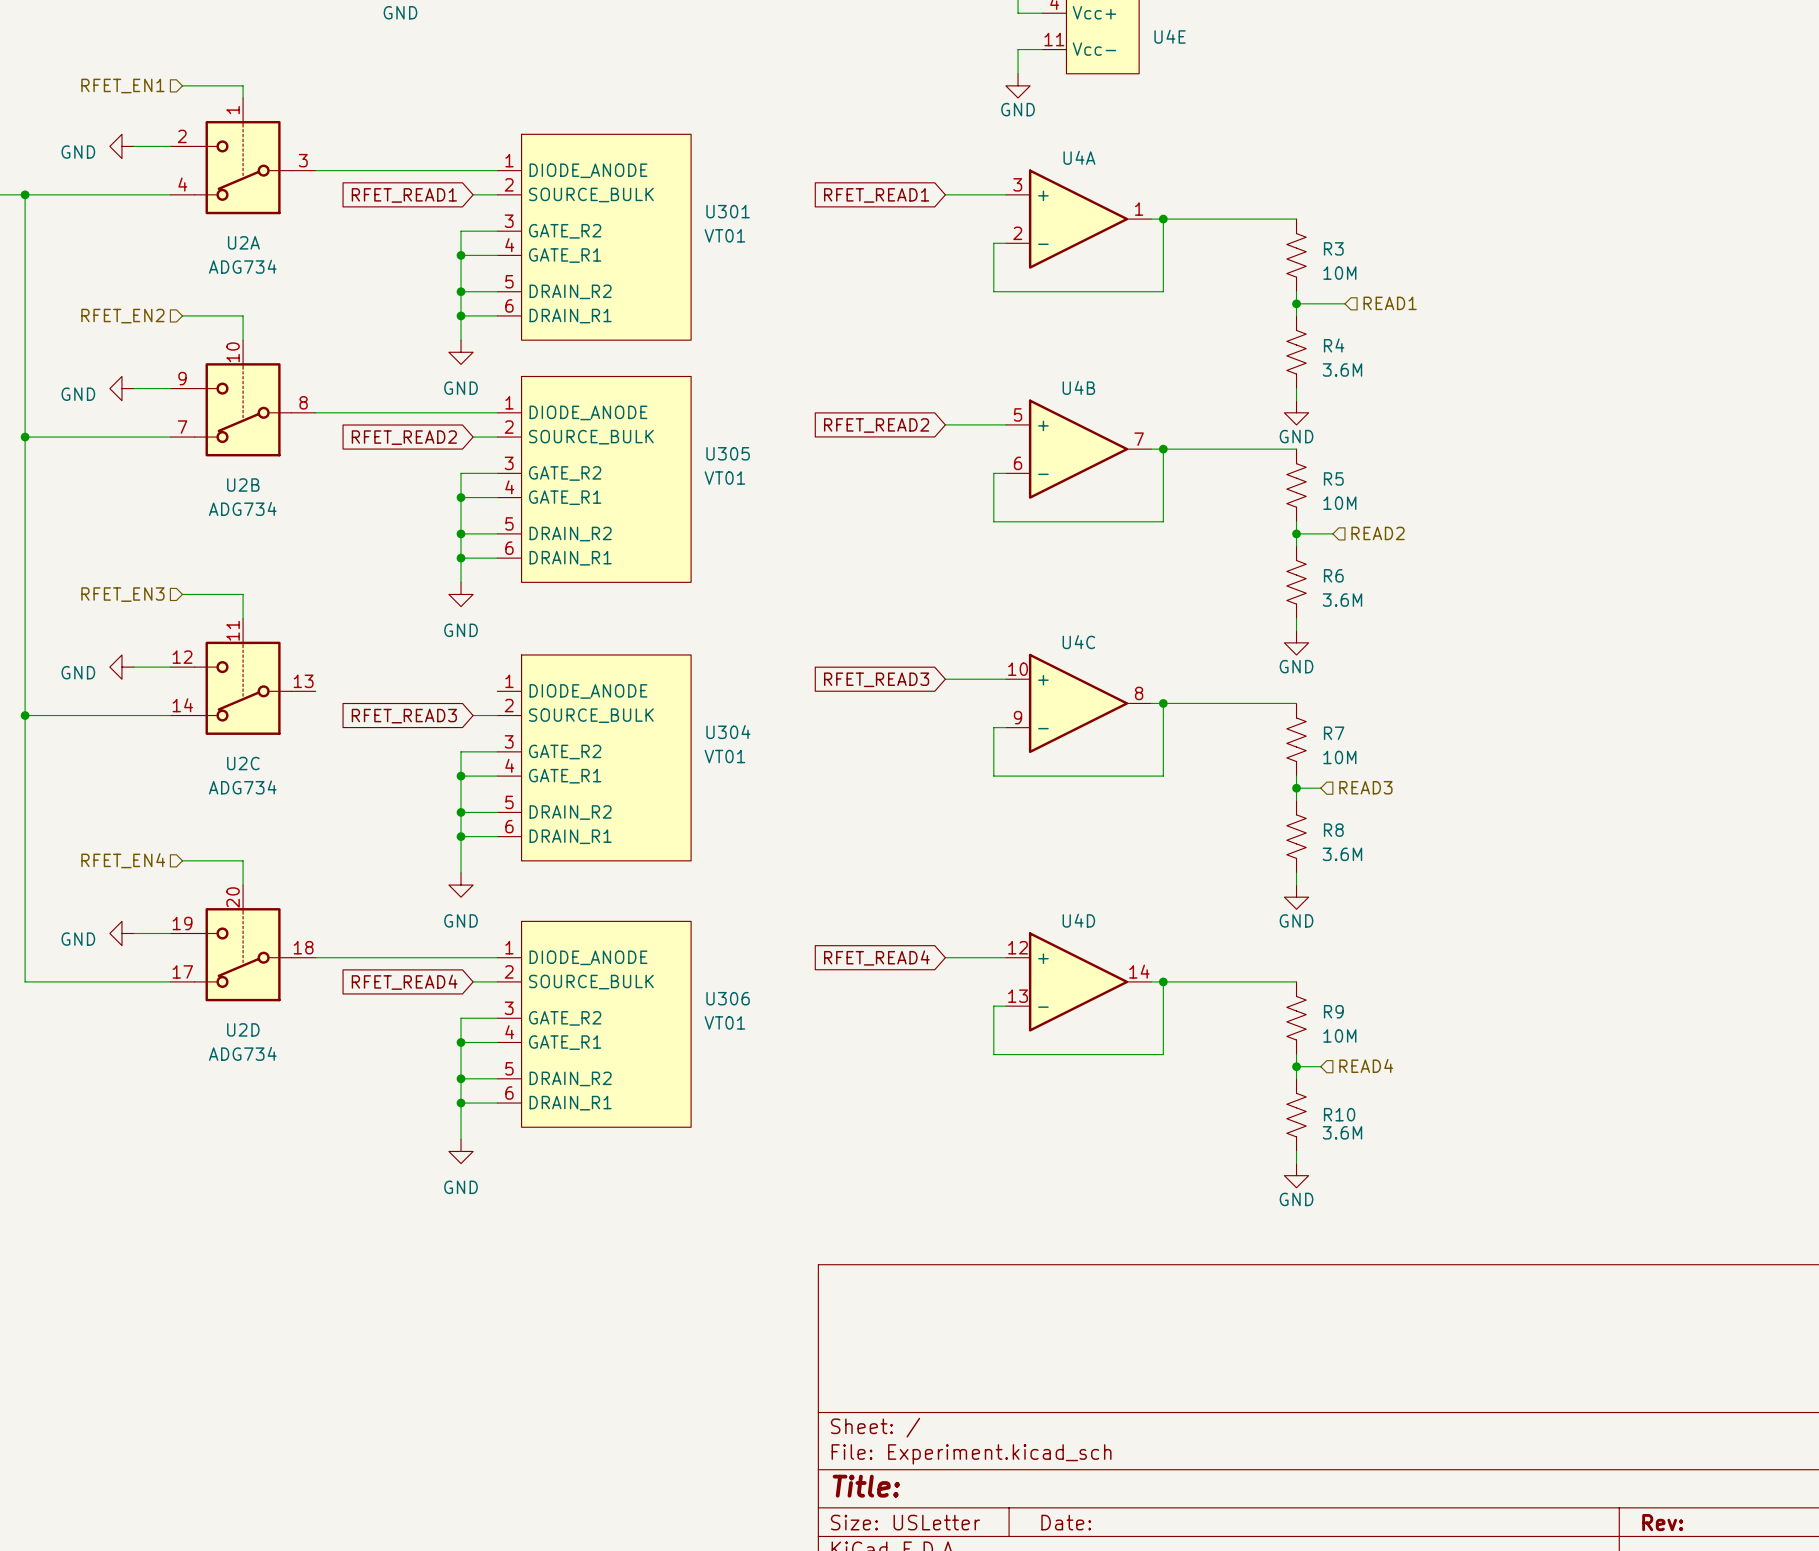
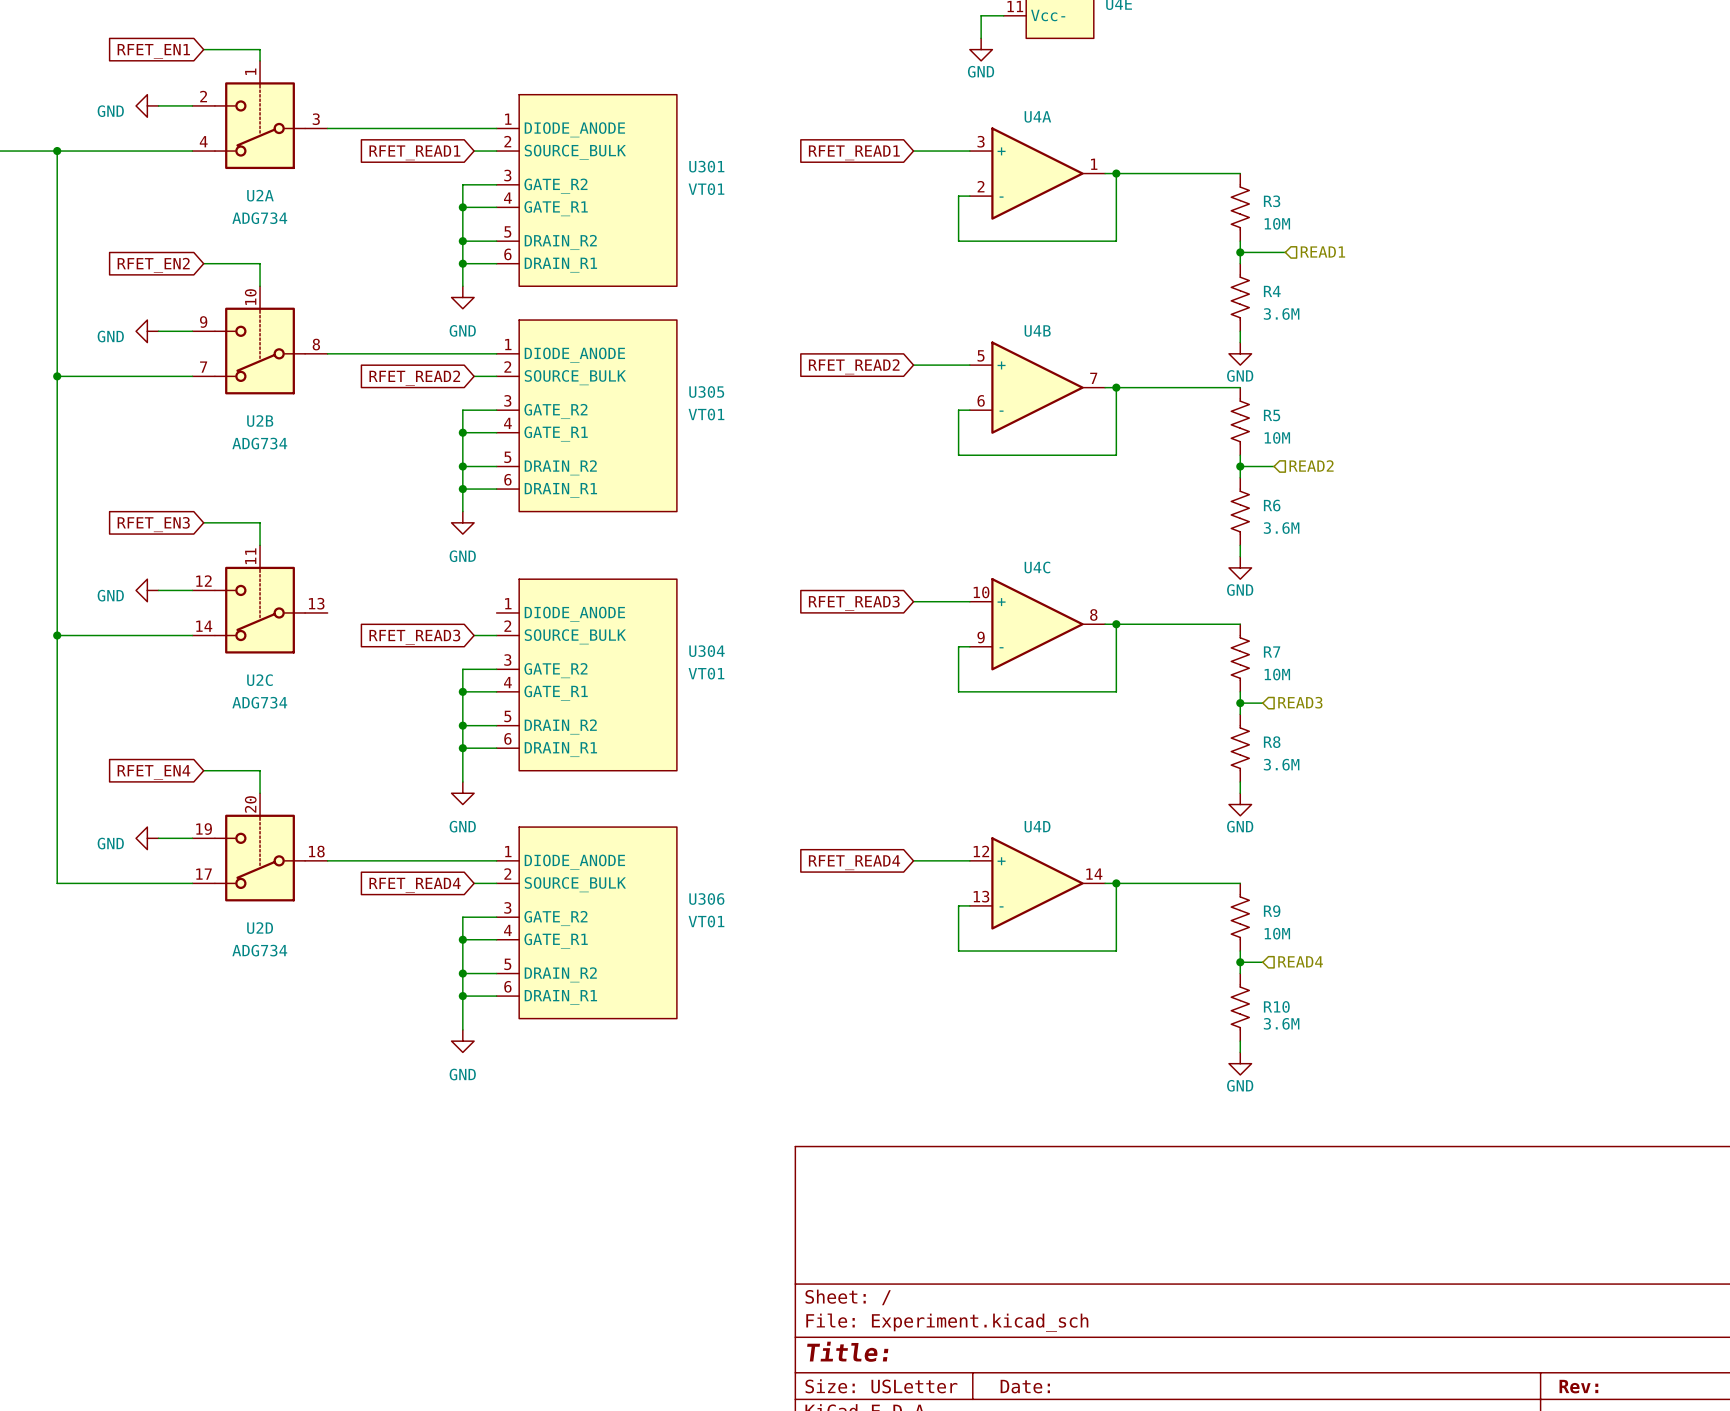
hierarchical label: RFET_EN1 (122, 86) -> none
global label: none -> RFET_EN1 (153, 51)
hierarchical label: RFET_EN2 (122, 316) -> none
global label: none -> RFET_EN2 (153, 265)
hierarchical label: RFET_EN3 (122, 594) -> none
global label: none -> RFET_EN3 (153, 524)
hierarchical label: RFET_EN4 (123, 860) -> none
global label: none -> RFET_EN4 (153, 772)

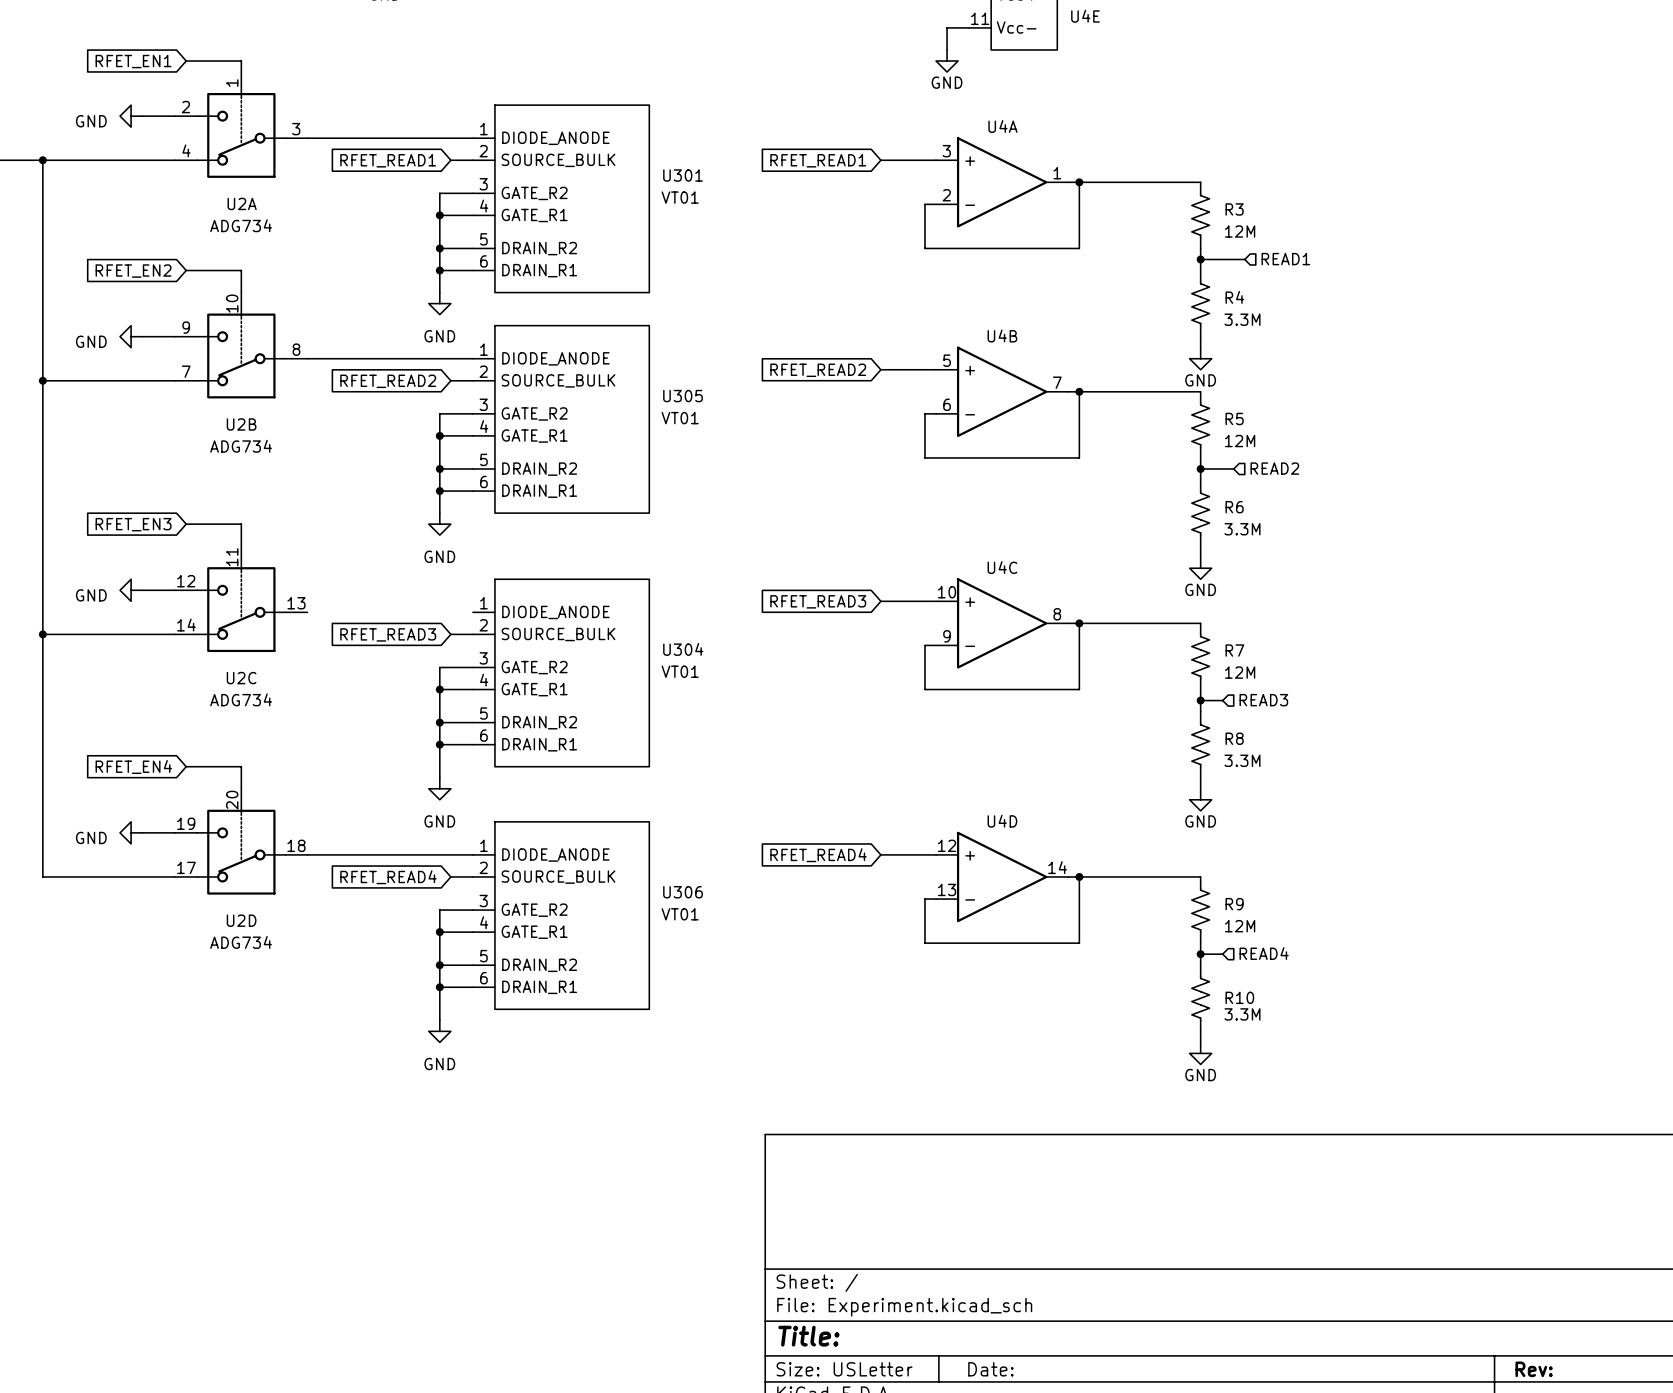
R3 value: 10M (1277, 223) -> 12M (1240, 231)
R4 value: 3.6M (1281, 313) -> 3.3M (1242, 319)
R5 value: 10M (1277, 437) -> 12M (1240, 441)
R6 value: 3.6M (1281, 528) -> 3.3M (1242, 529)
R7 value: 10M (1277, 674) -> 12M (1240, 672)
R8 value: 3.6M (1281, 764) -> 3.3M (1242, 760)
R9 value: 10M (1277, 933) -> 12M (1240, 926)
R10 value: 3.6M (1281, 1023) -> 3.3M (1242, 1014)

